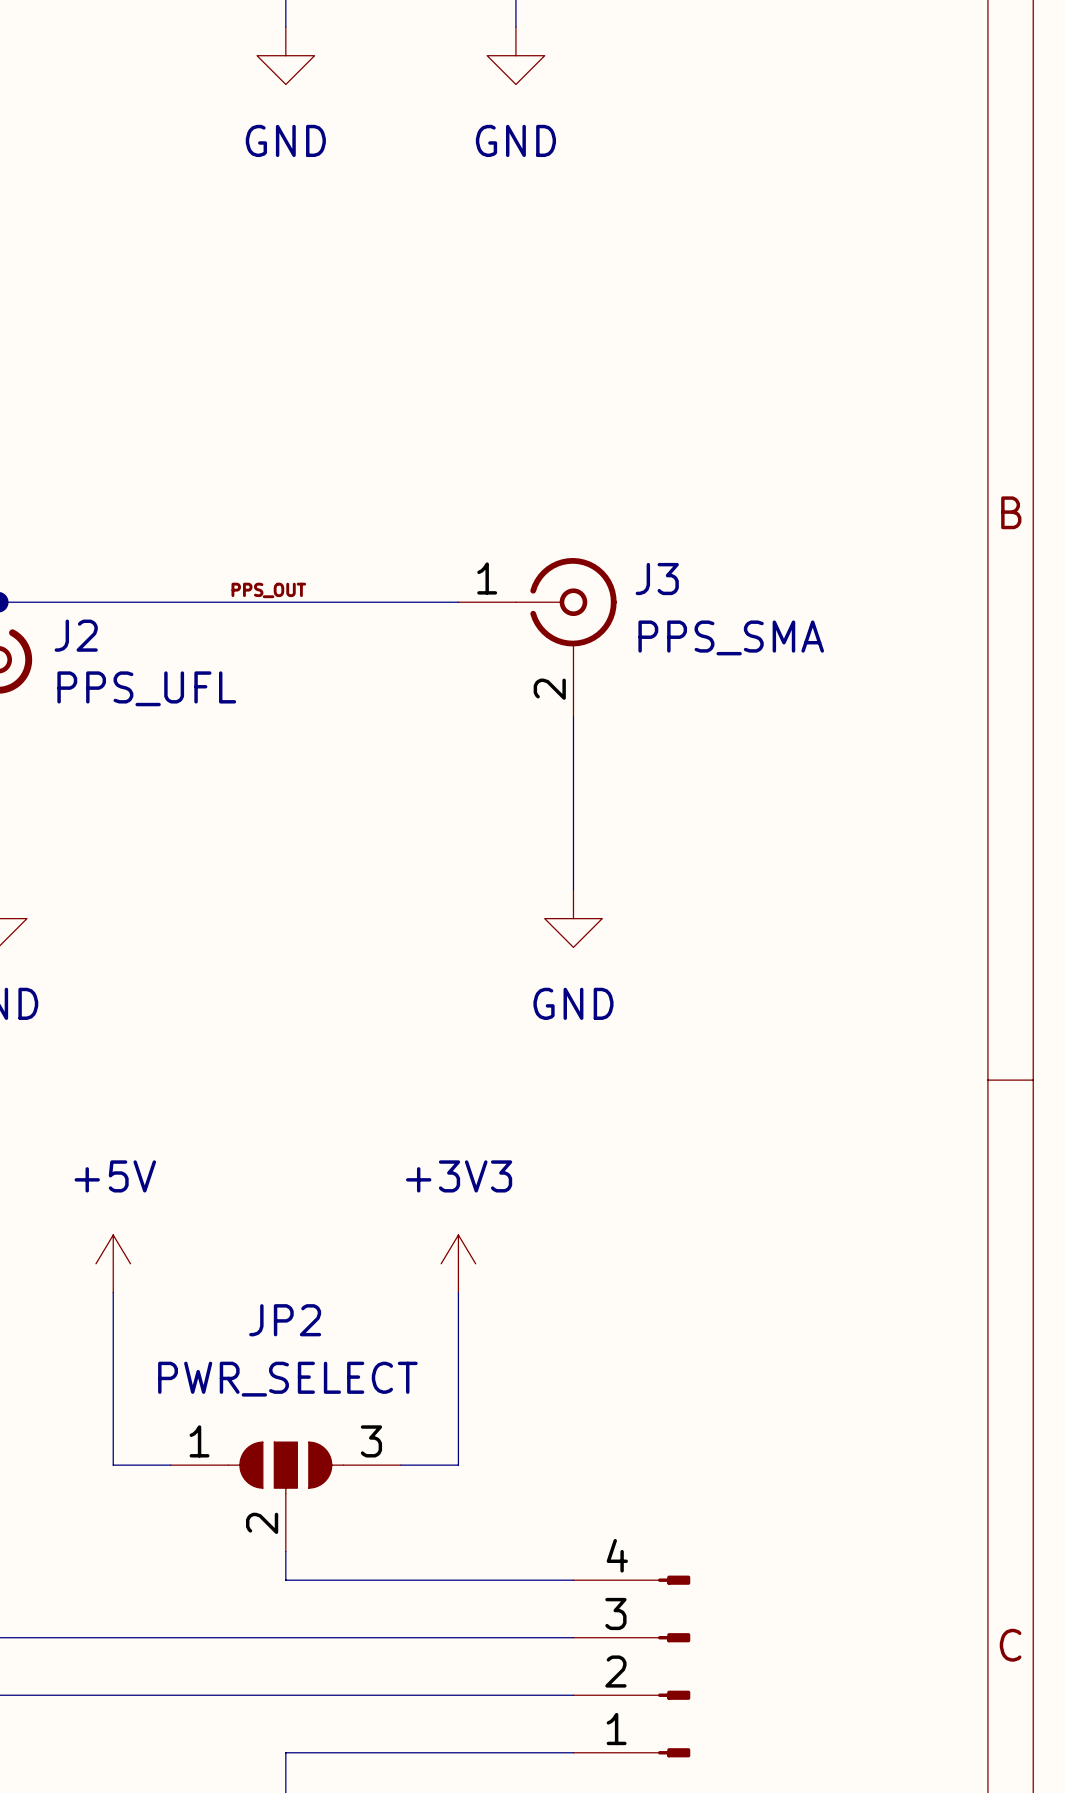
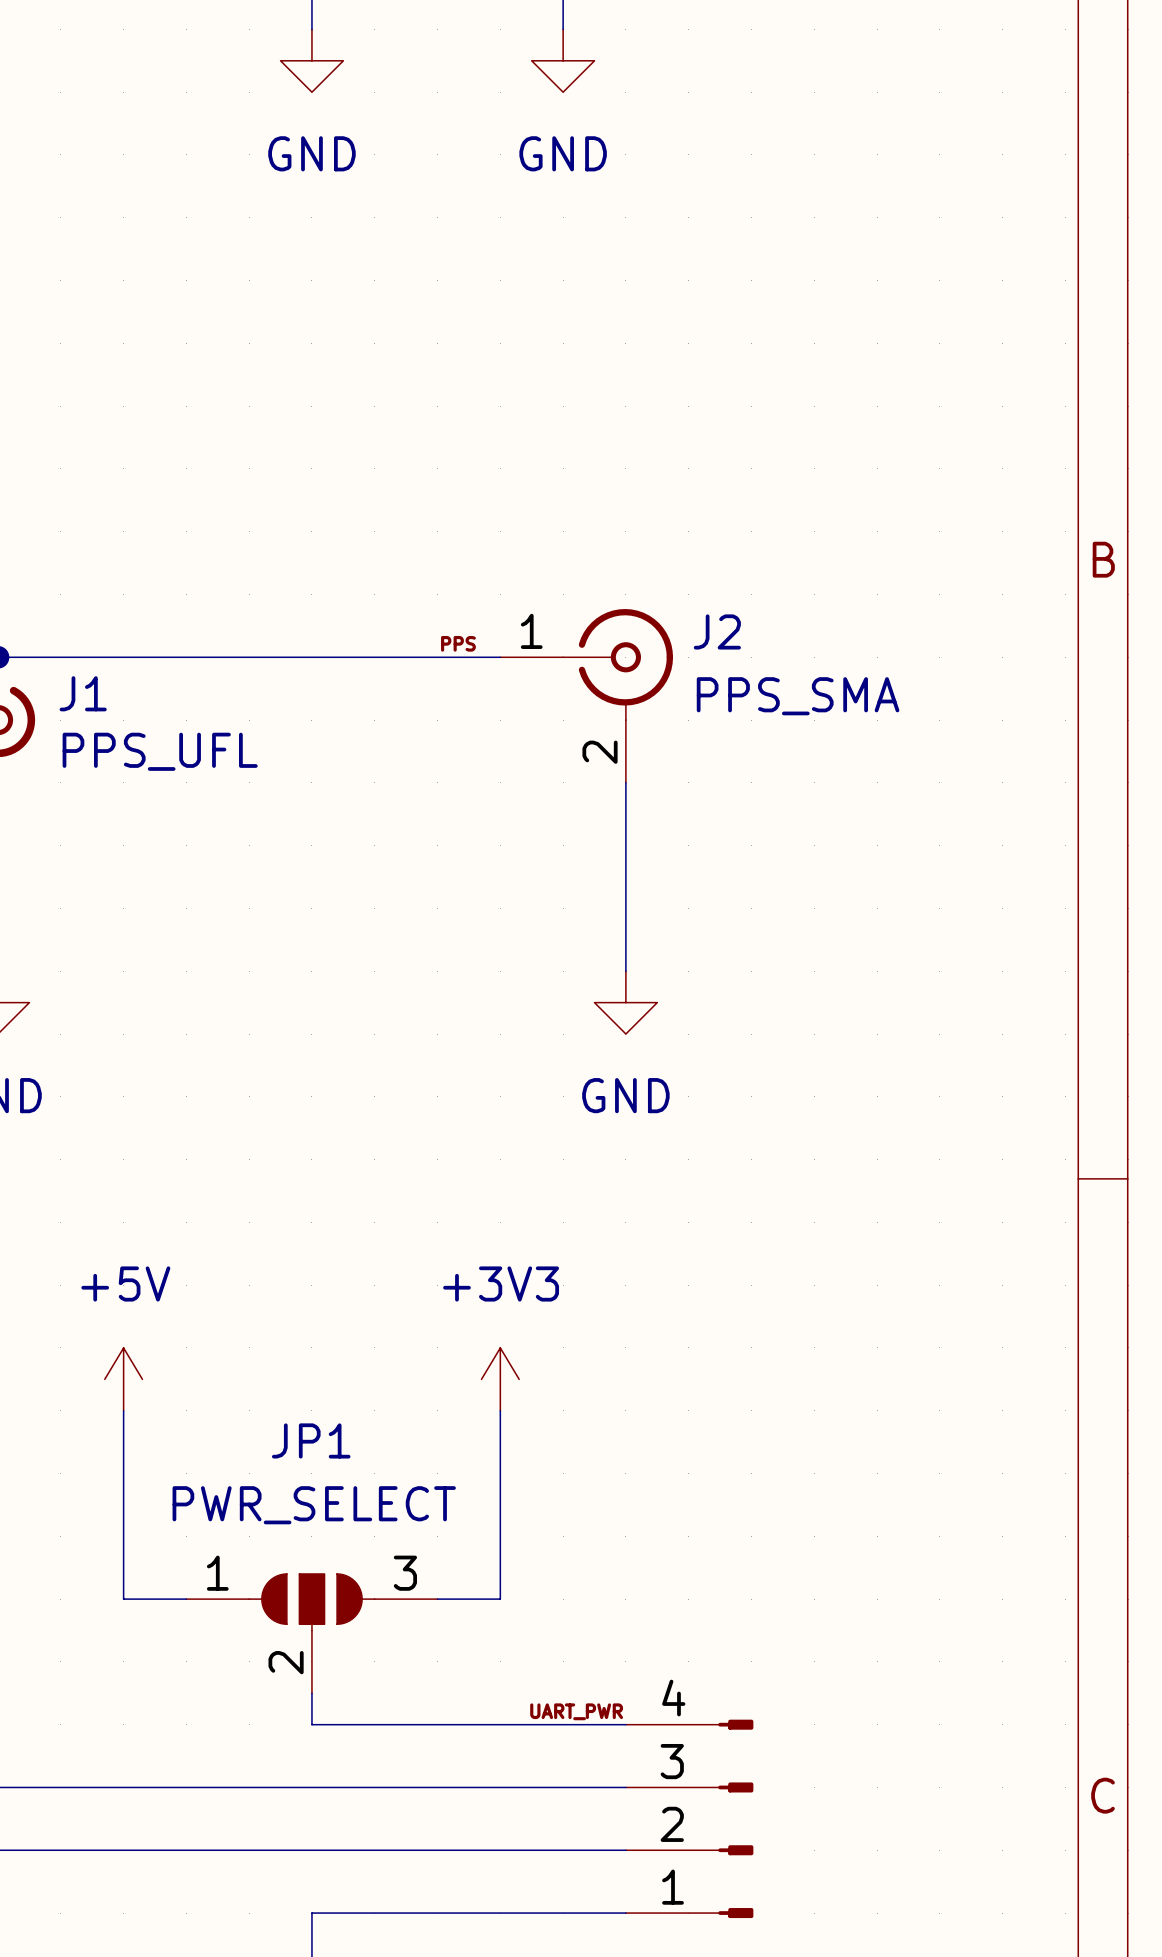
J3 name: J3 (657, 579) -> J2 (717, 631)
label: none -> PPS (458, 643)
label: PPS_OUT (268, 590) -> none
J2 name: J2 (76, 635) -> J1 (83, 693)
JP2 name: JP2 (285, 1320) -> JP1 (311, 1440)
label: none -> UART_PWR (576, 1711)

